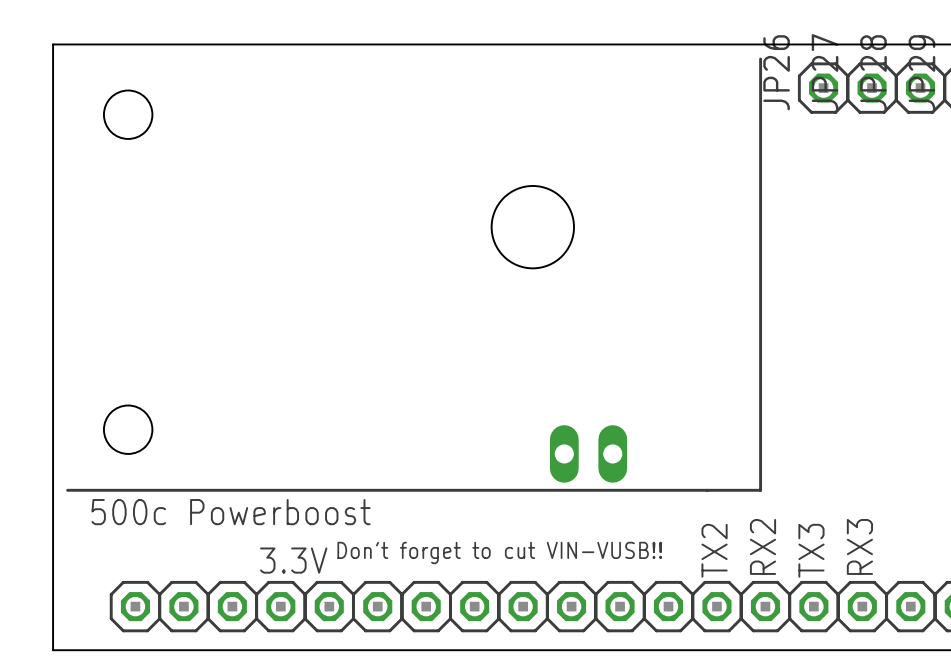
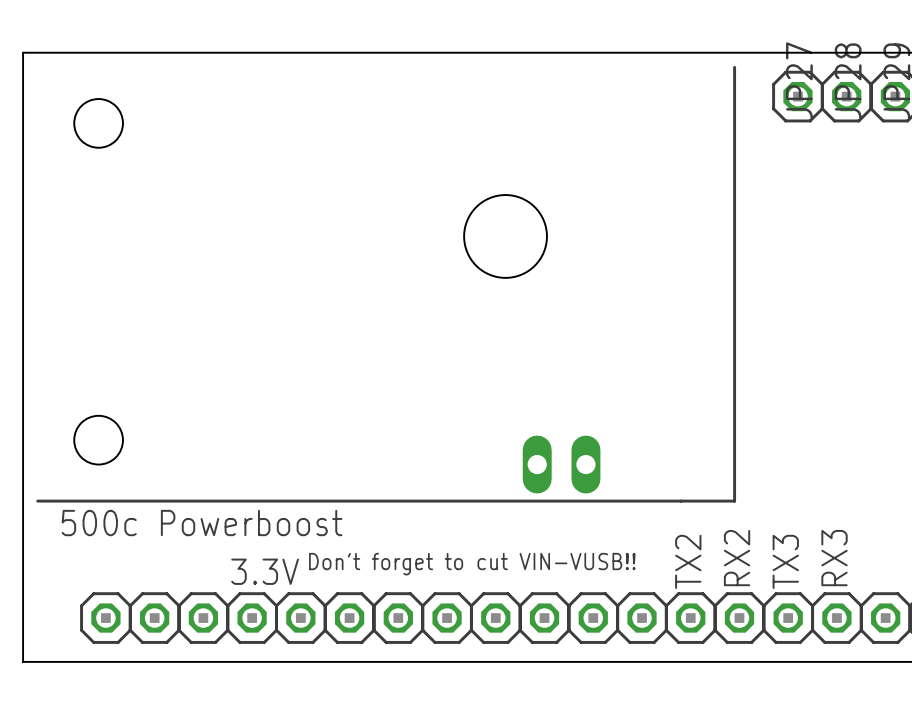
JP26 name: JP26 (776, 72) -> none

